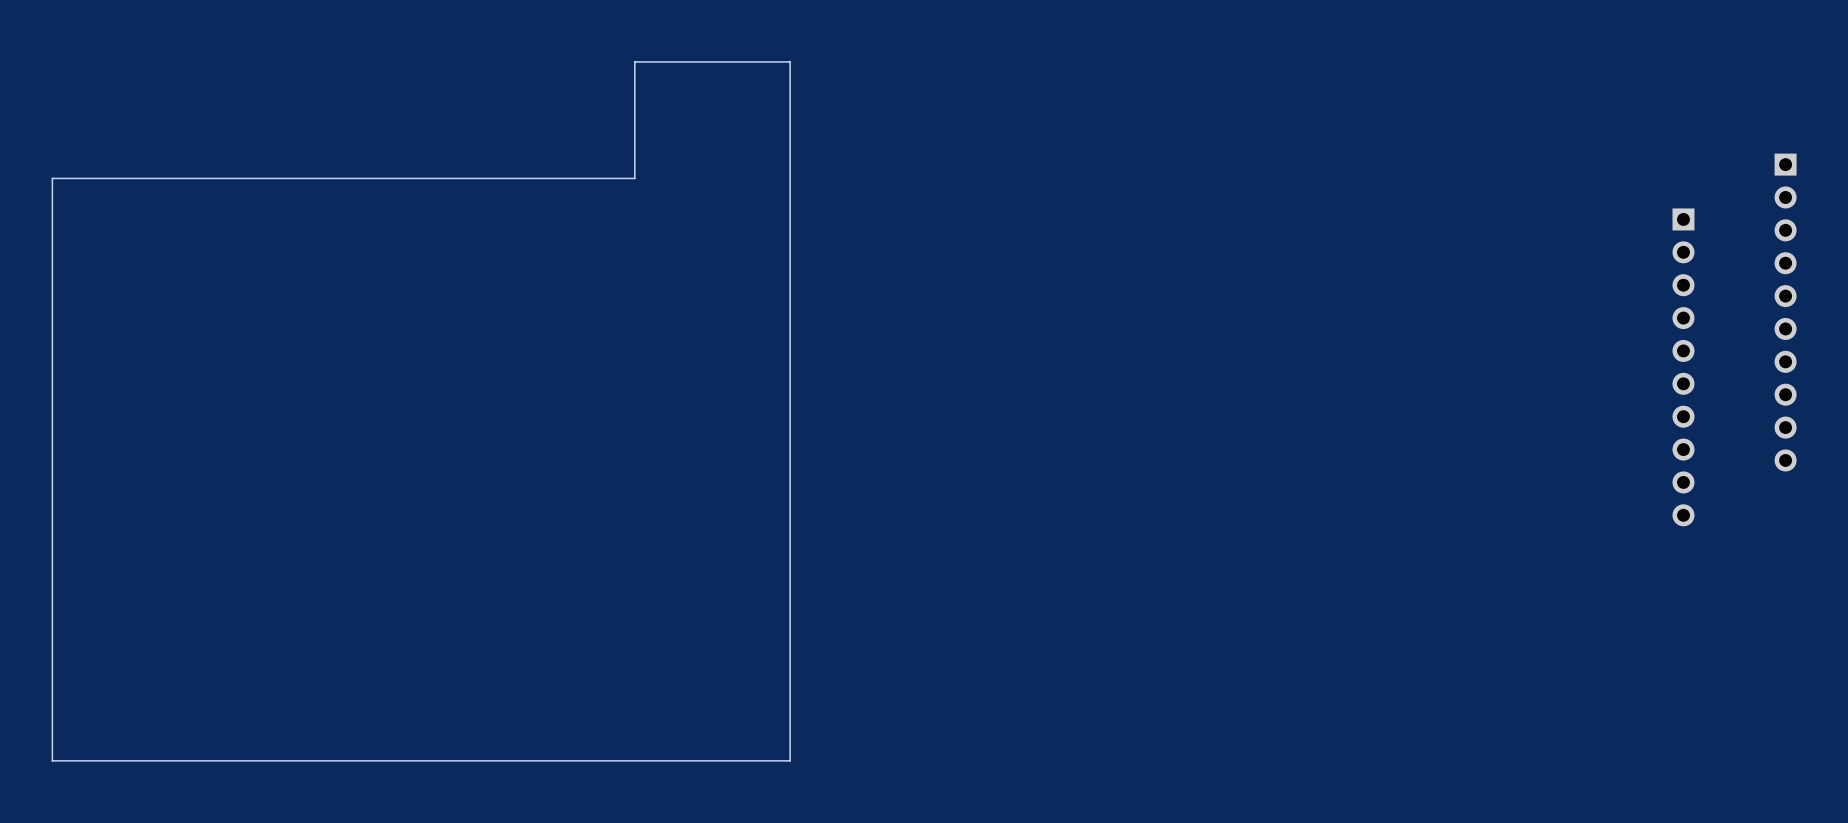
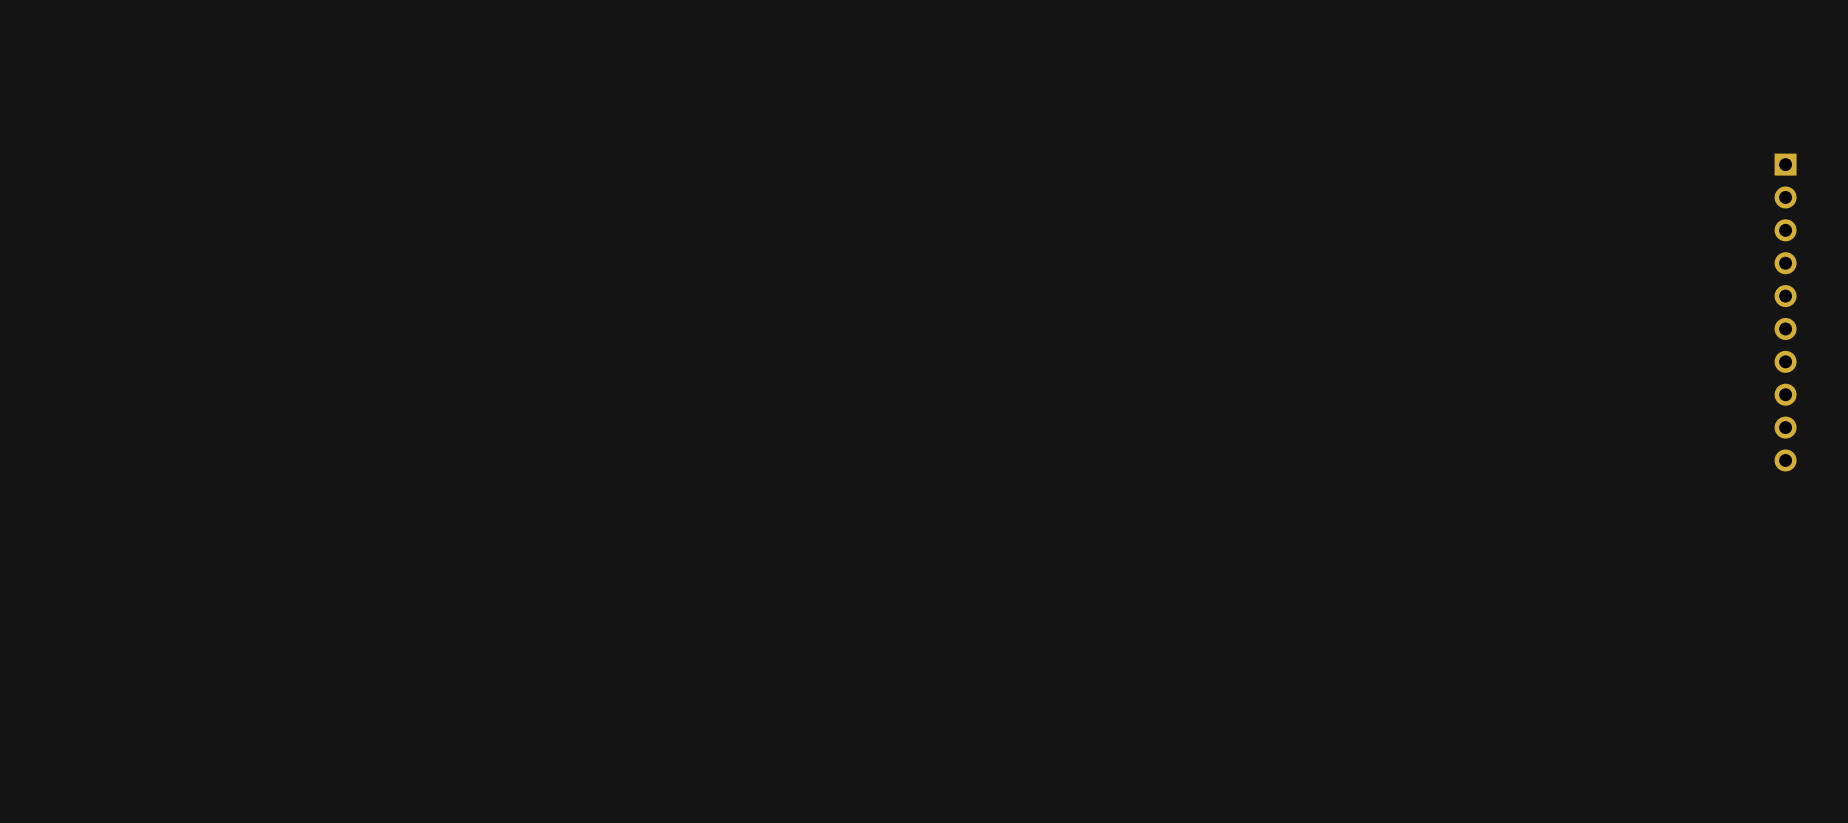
board edge: (790, 61) (634, 61) (634, 178) (52, 178) (52, 760) (790, 760) (790, 61) -> none
part: (1683, 367) -> none

